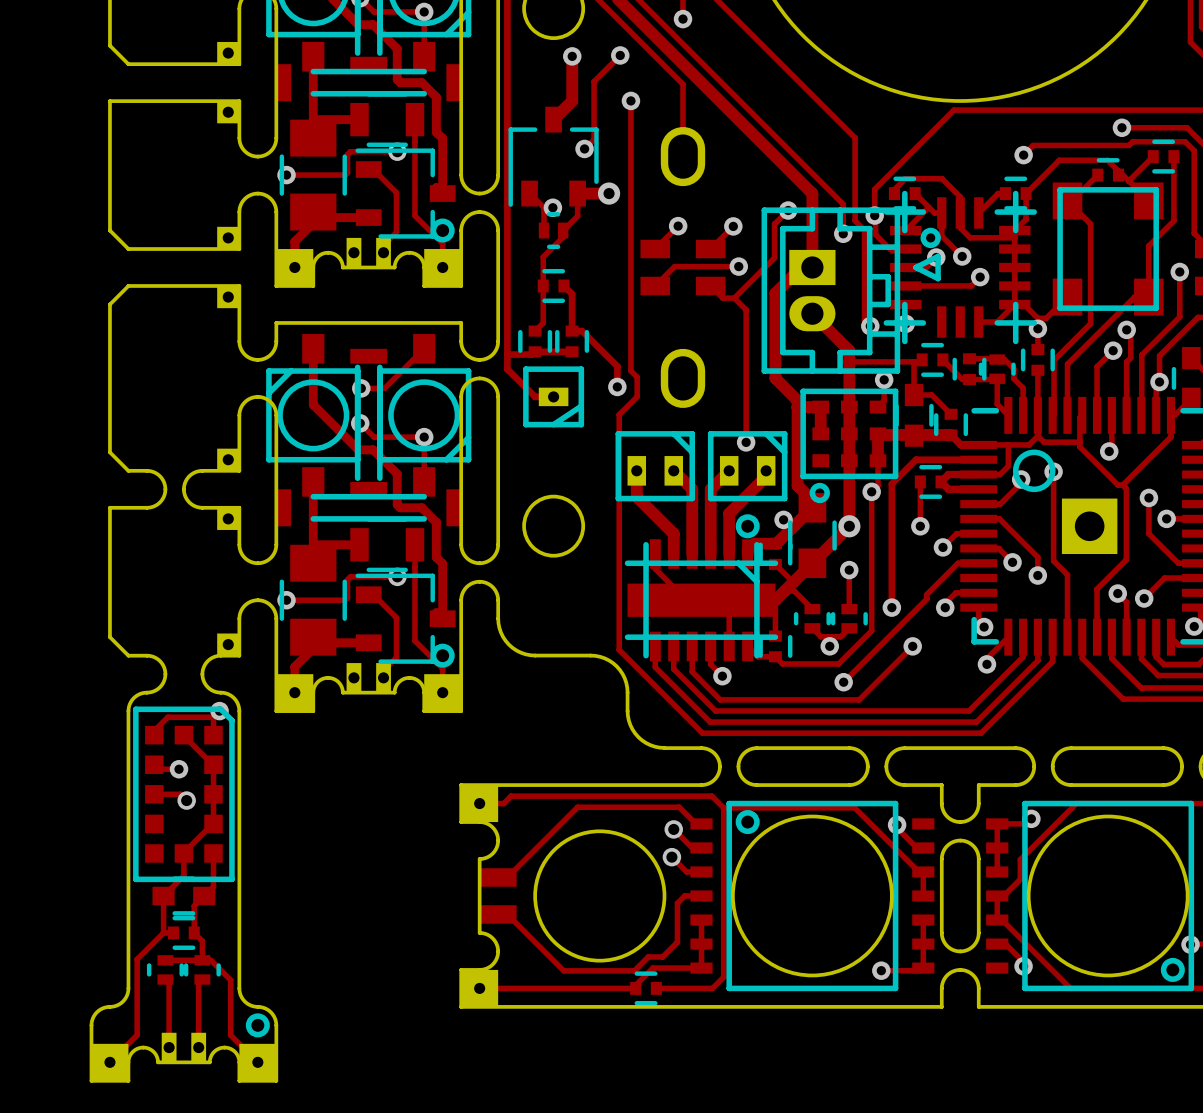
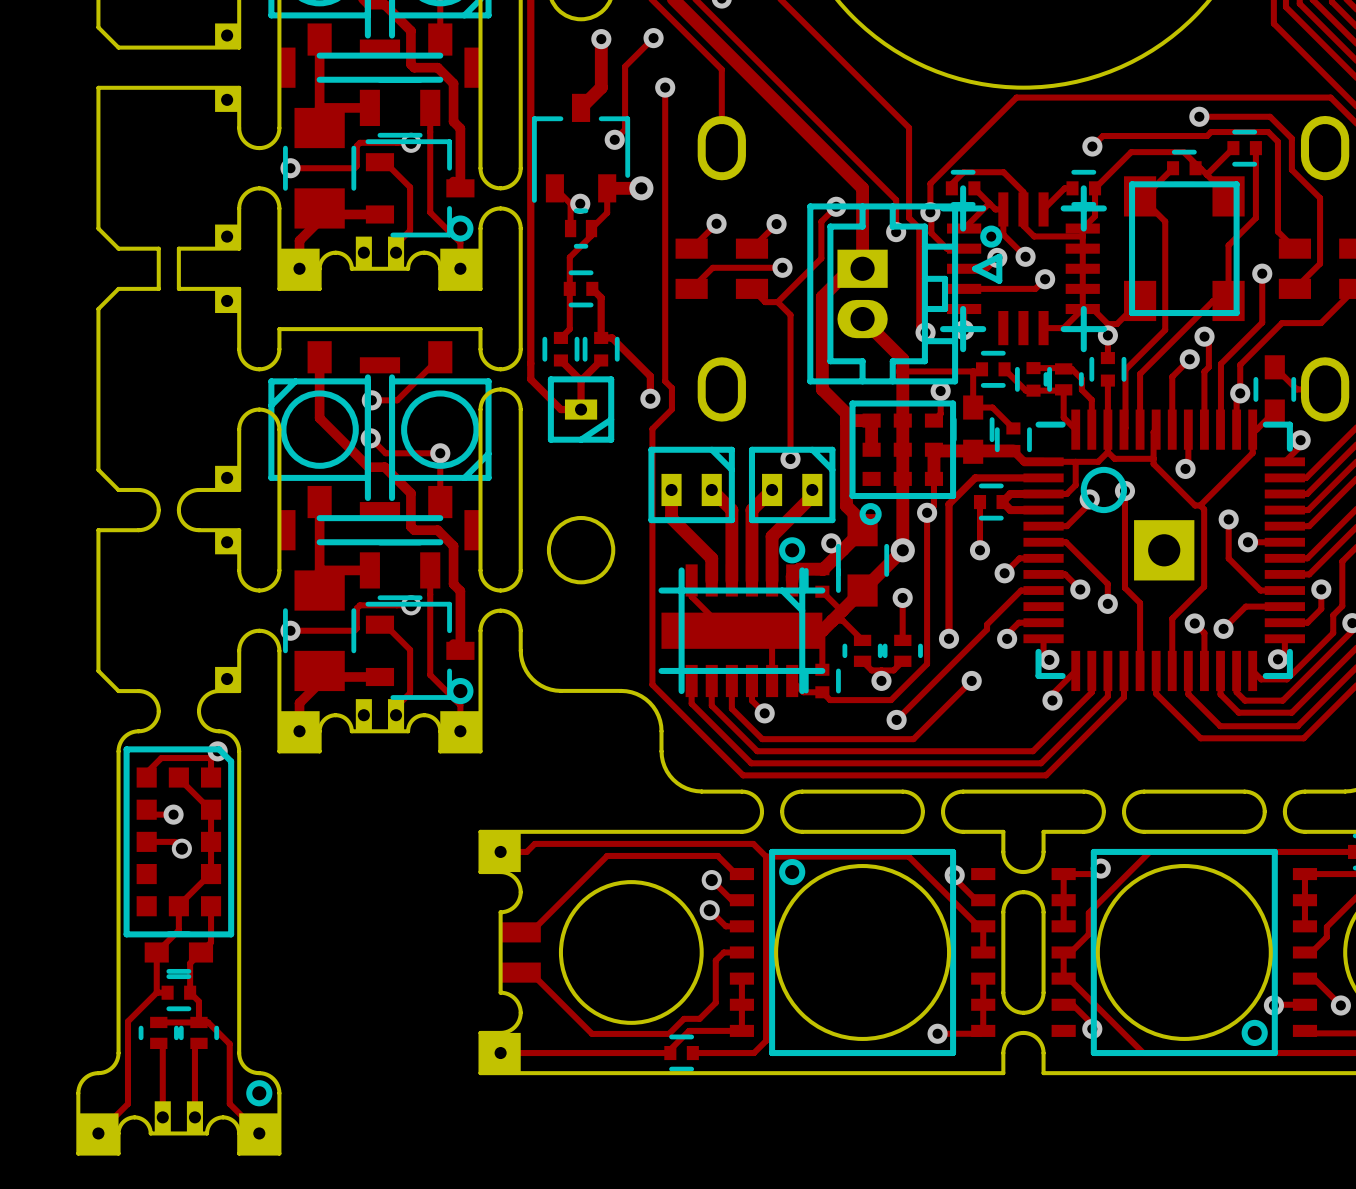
board edge: (165, 249) (183, 249) -> (158, 248) (158, 288)
board edge: (165, 285) (183, 285) -> (178, 248) (178, 288)
track: none -> (560, 360) (581, 380)
track: (572, 351) (535, 351) (532, 354) (507, 354) -> (601, 360) (581, 380)
track: none -> (581, 380) (581, 409)

